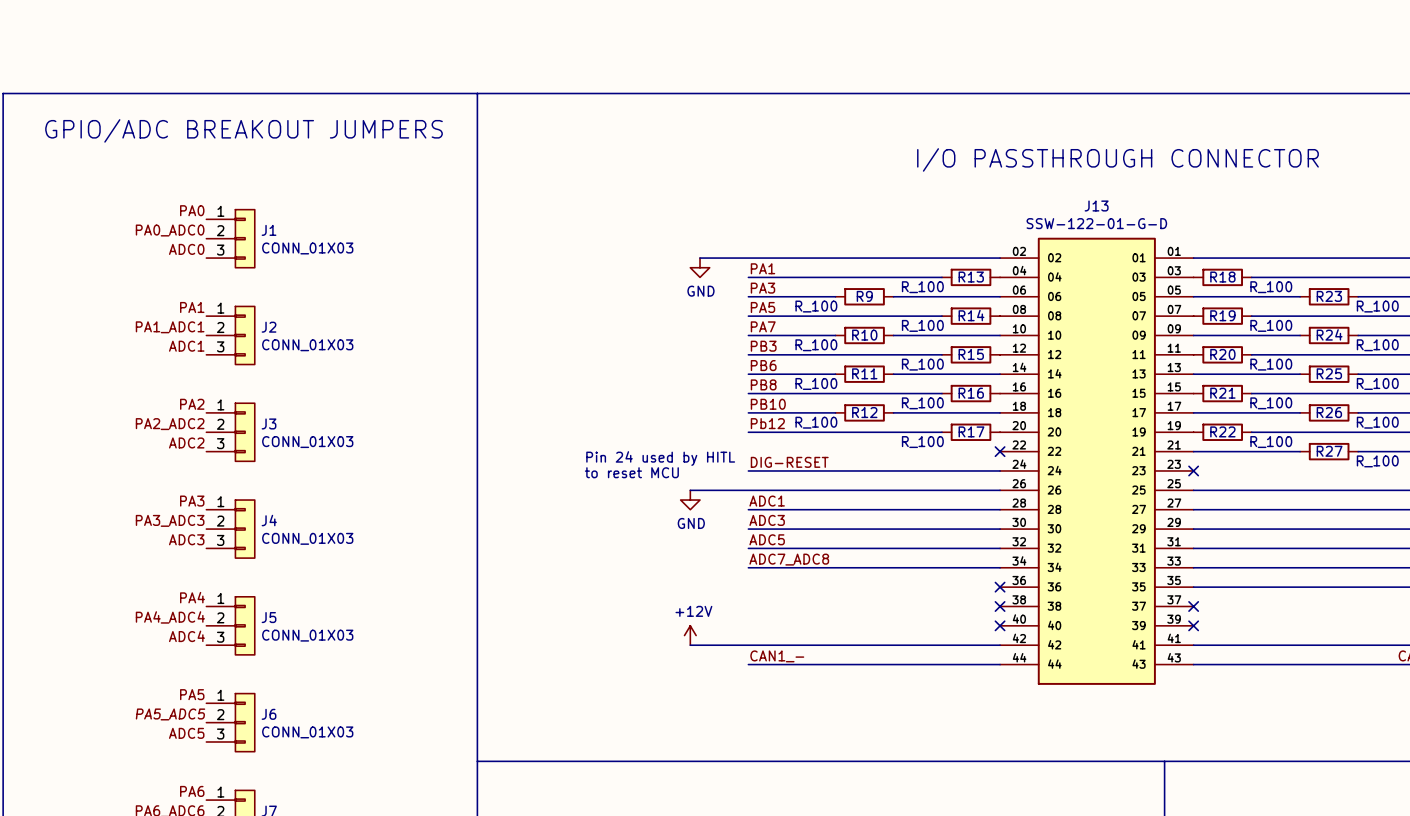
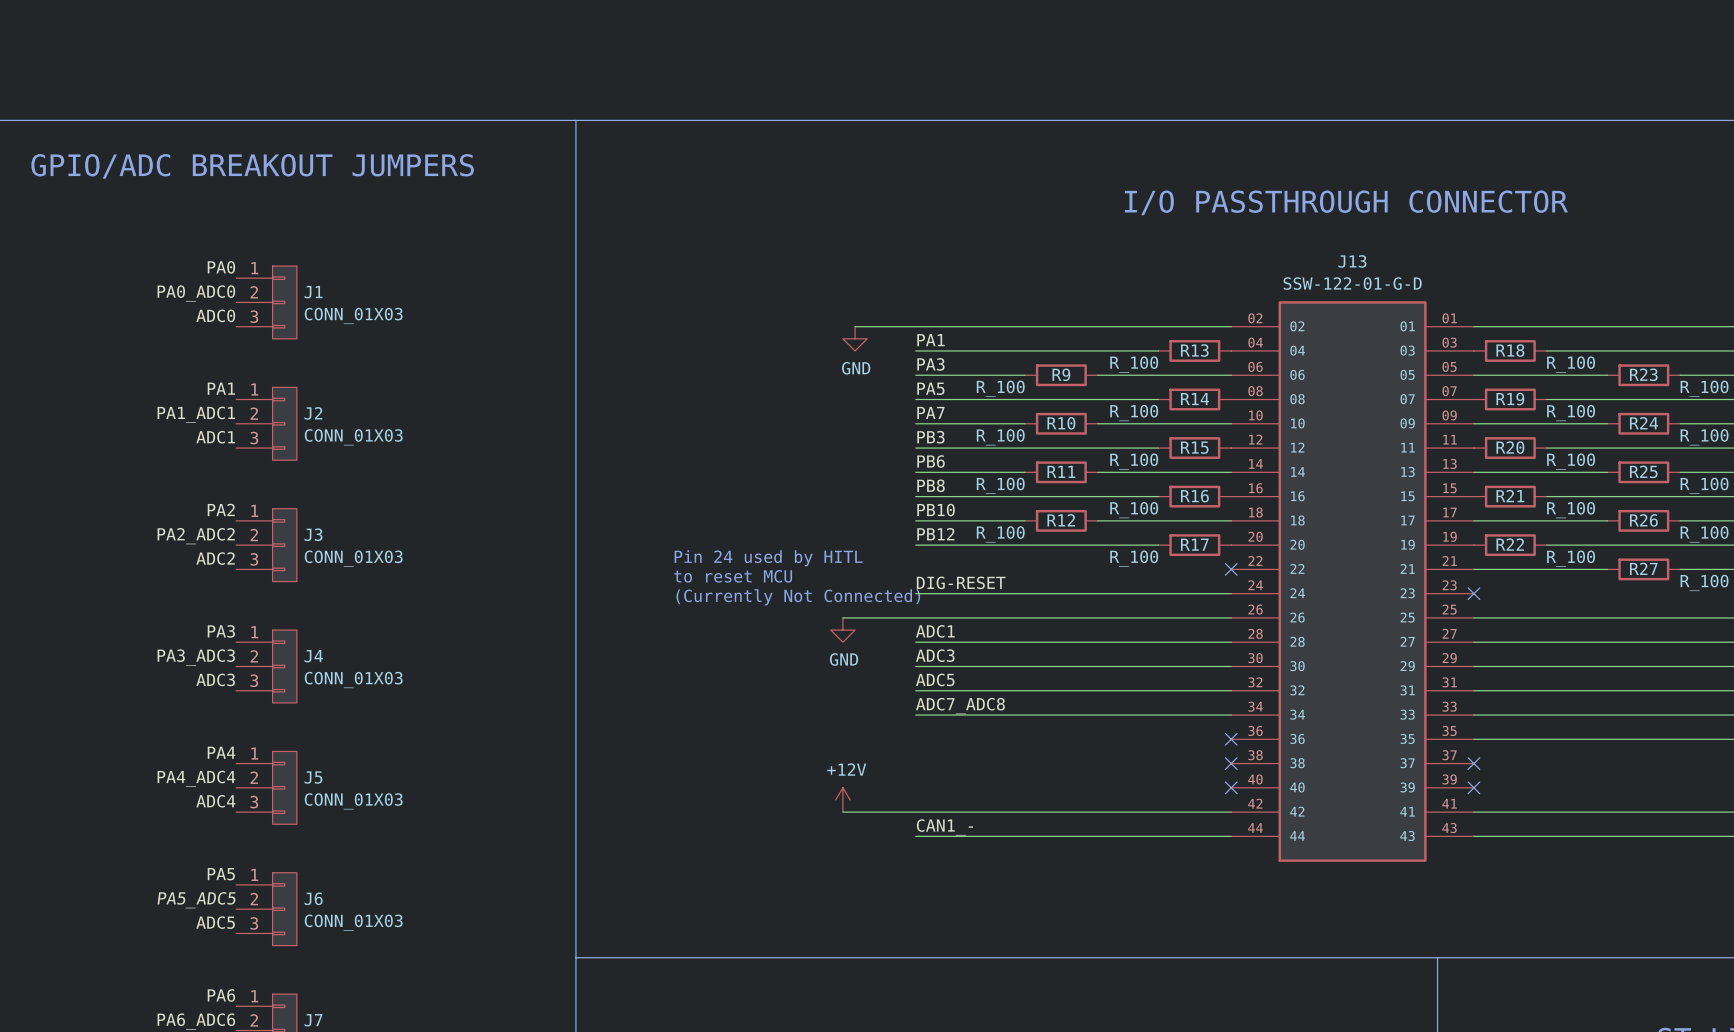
label: Pb12 (767, 423) -> PB12 (935, 534)
text position: Pin 24 used by HITL (660, 458) -> Pin 24 used by HITL (768, 558)
text position: to reset MCU (631, 472) -> to reset MCU (733, 576)
text: none -> (Currently Not Connected) (798, 597)

